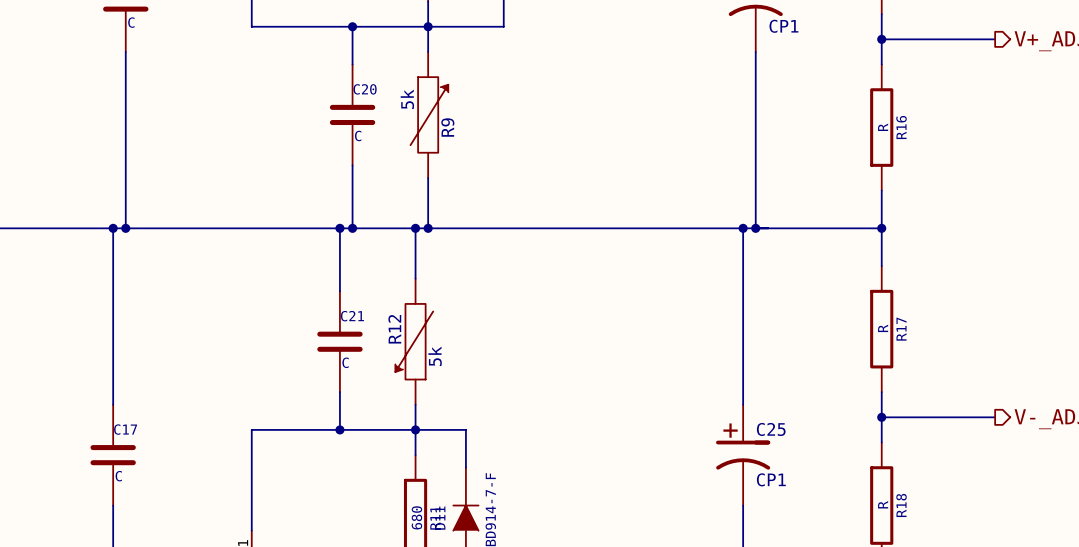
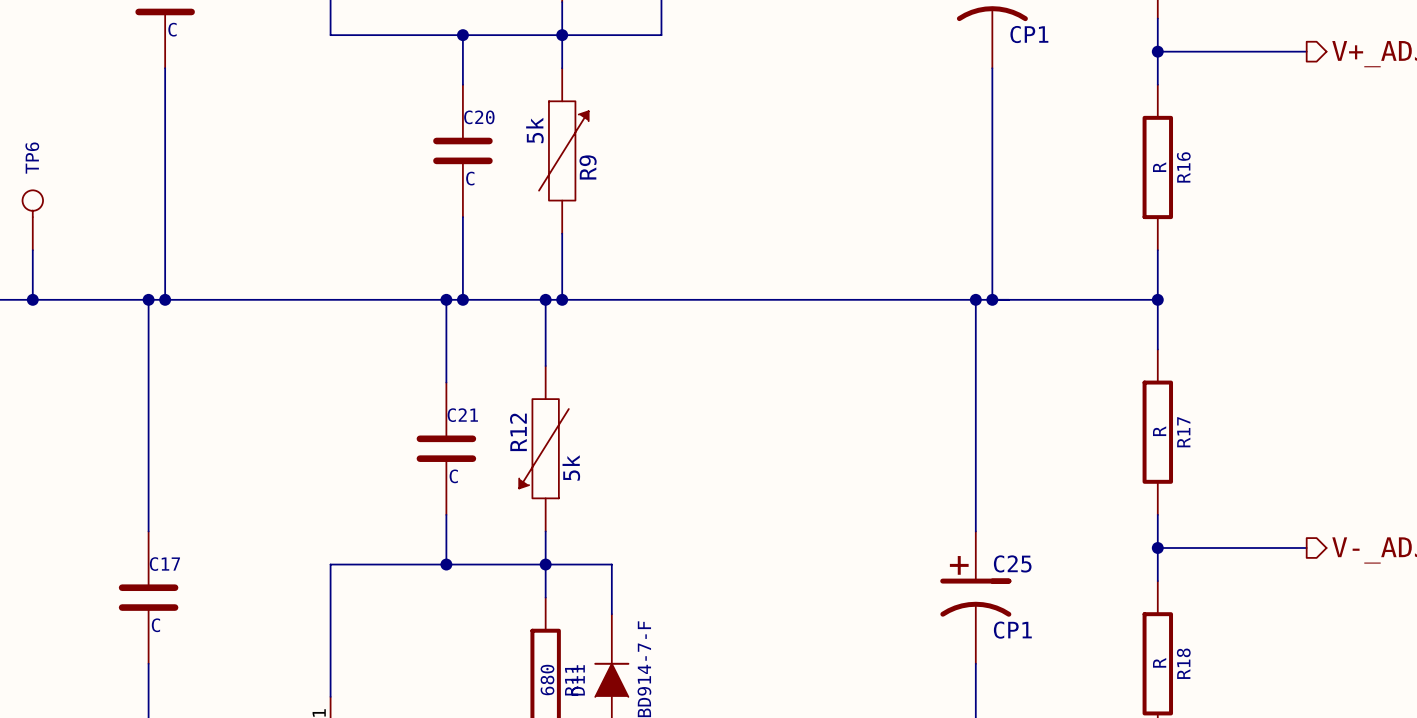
TP6: none -> (32, 220)
wire: none -> (32, 250) (32, 299)
junction: none -> (32, 299)

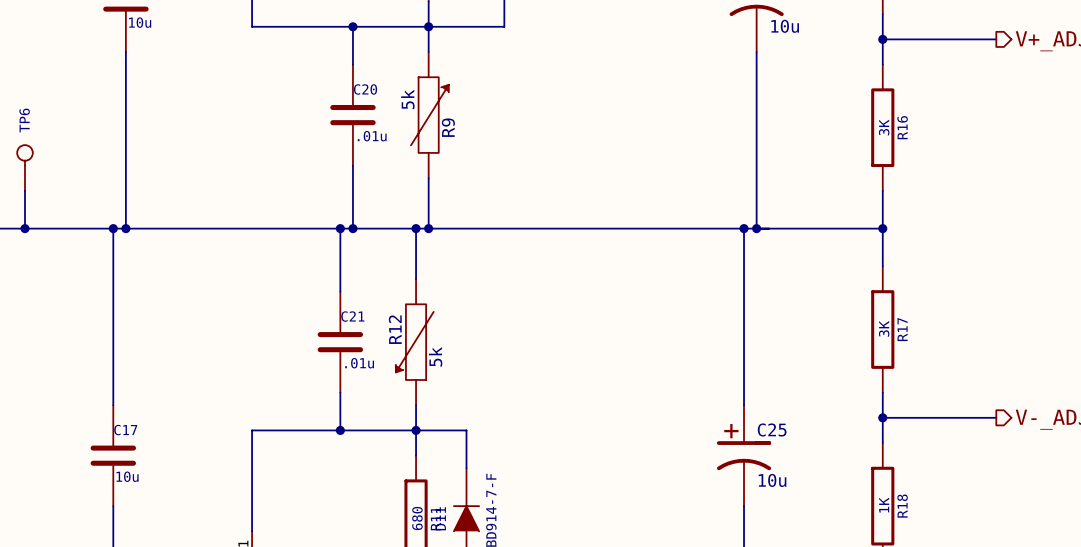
part value: C (172, 29) -> 10u (140, 22)
part value: CP1 (1029, 34) -> 10u (785, 26)
R16 value: R (1159, 167) -> 3K (884, 127)
C20 value: C (470, 178) -> .01u (372, 136)
R17 value: R (1159, 431) -> 3K (884, 328)
C21 value: C (453, 476) -> .01u (359, 363)
C17 value: C (155, 625) -> 10u (127, 476)
C25 value: CP1 (1012, 630) -> 10u (772, 480)
R18 value: R (1159, 662) -> 1K (884, 505)

